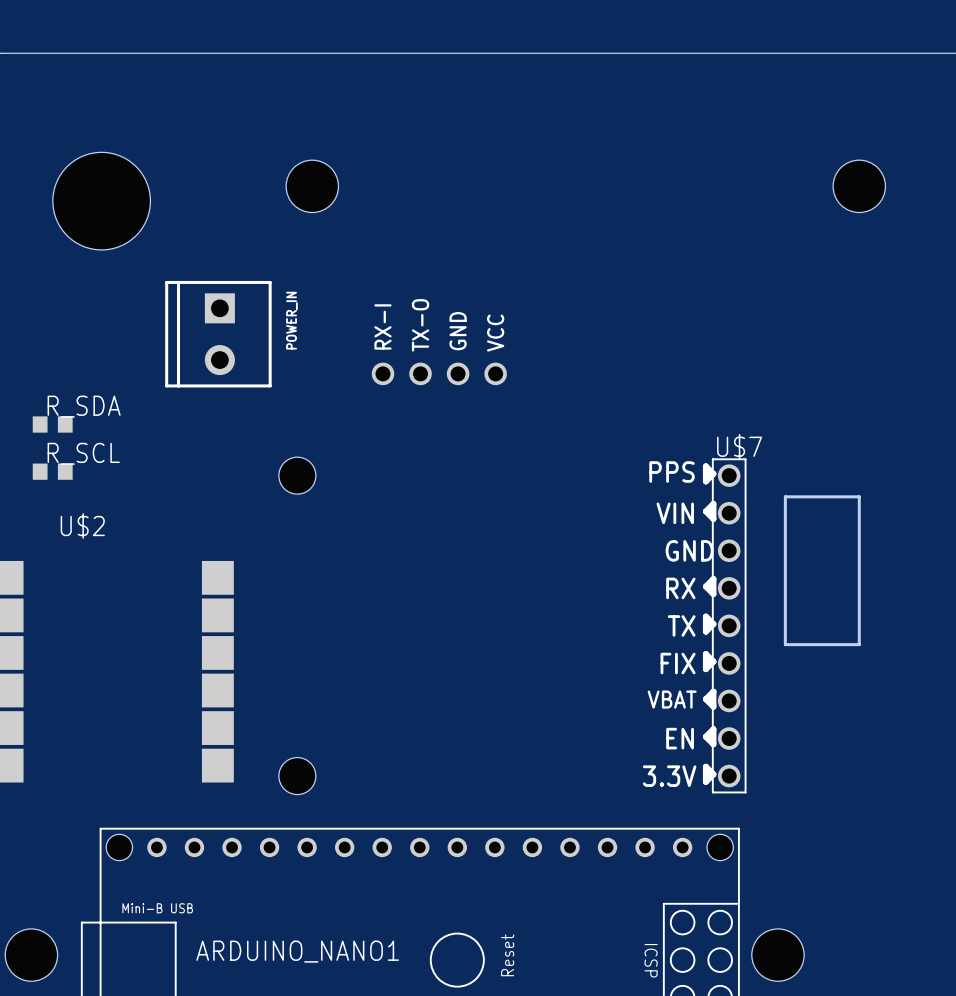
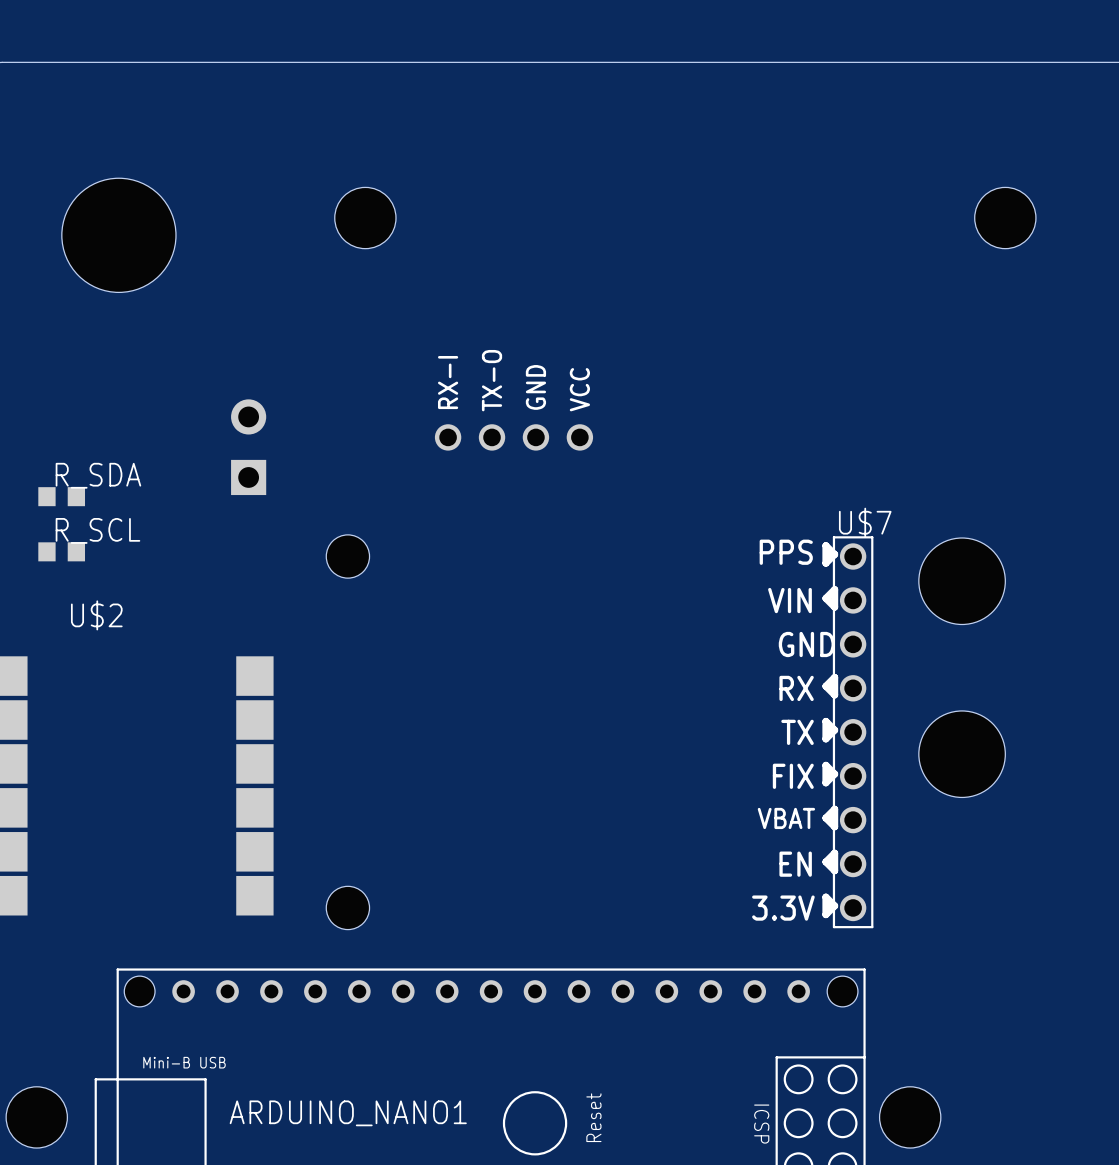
POWER_IN side: top (218, 334) -> bottom (248, 447)
board edge: (785, 496) (859, 496) (859, 644) (785, 644) (785, 496) -> none
hole: none -> (962, 581)
hole: none -> (962, 754)

